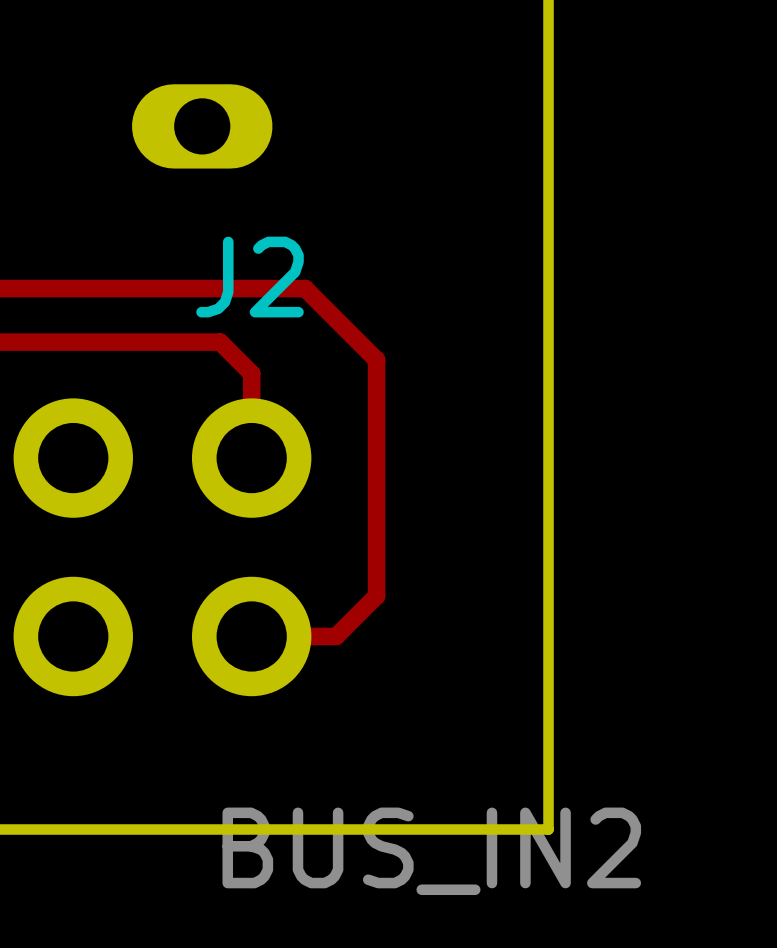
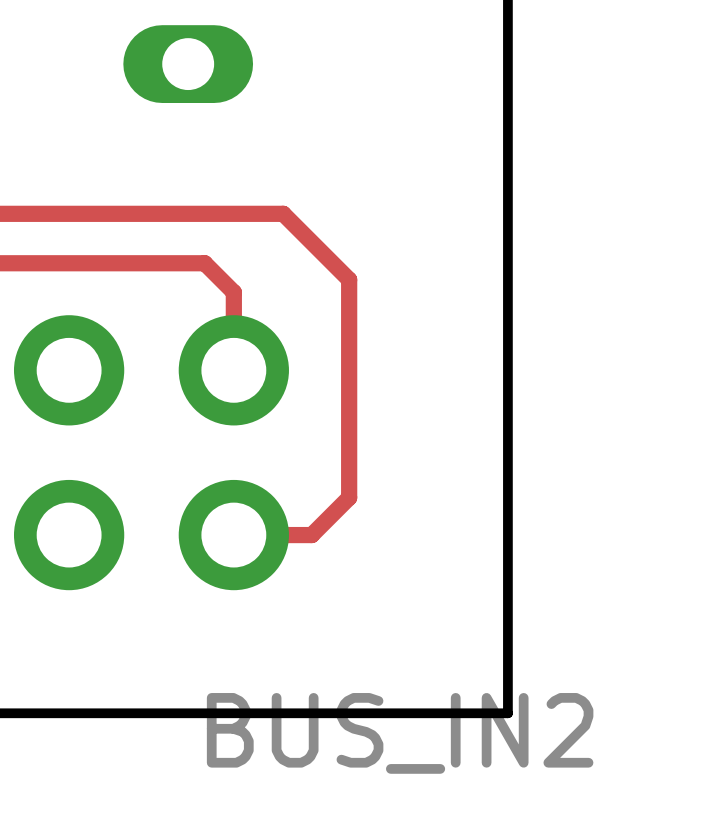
J2 name: J2 (250, 277) -> none

